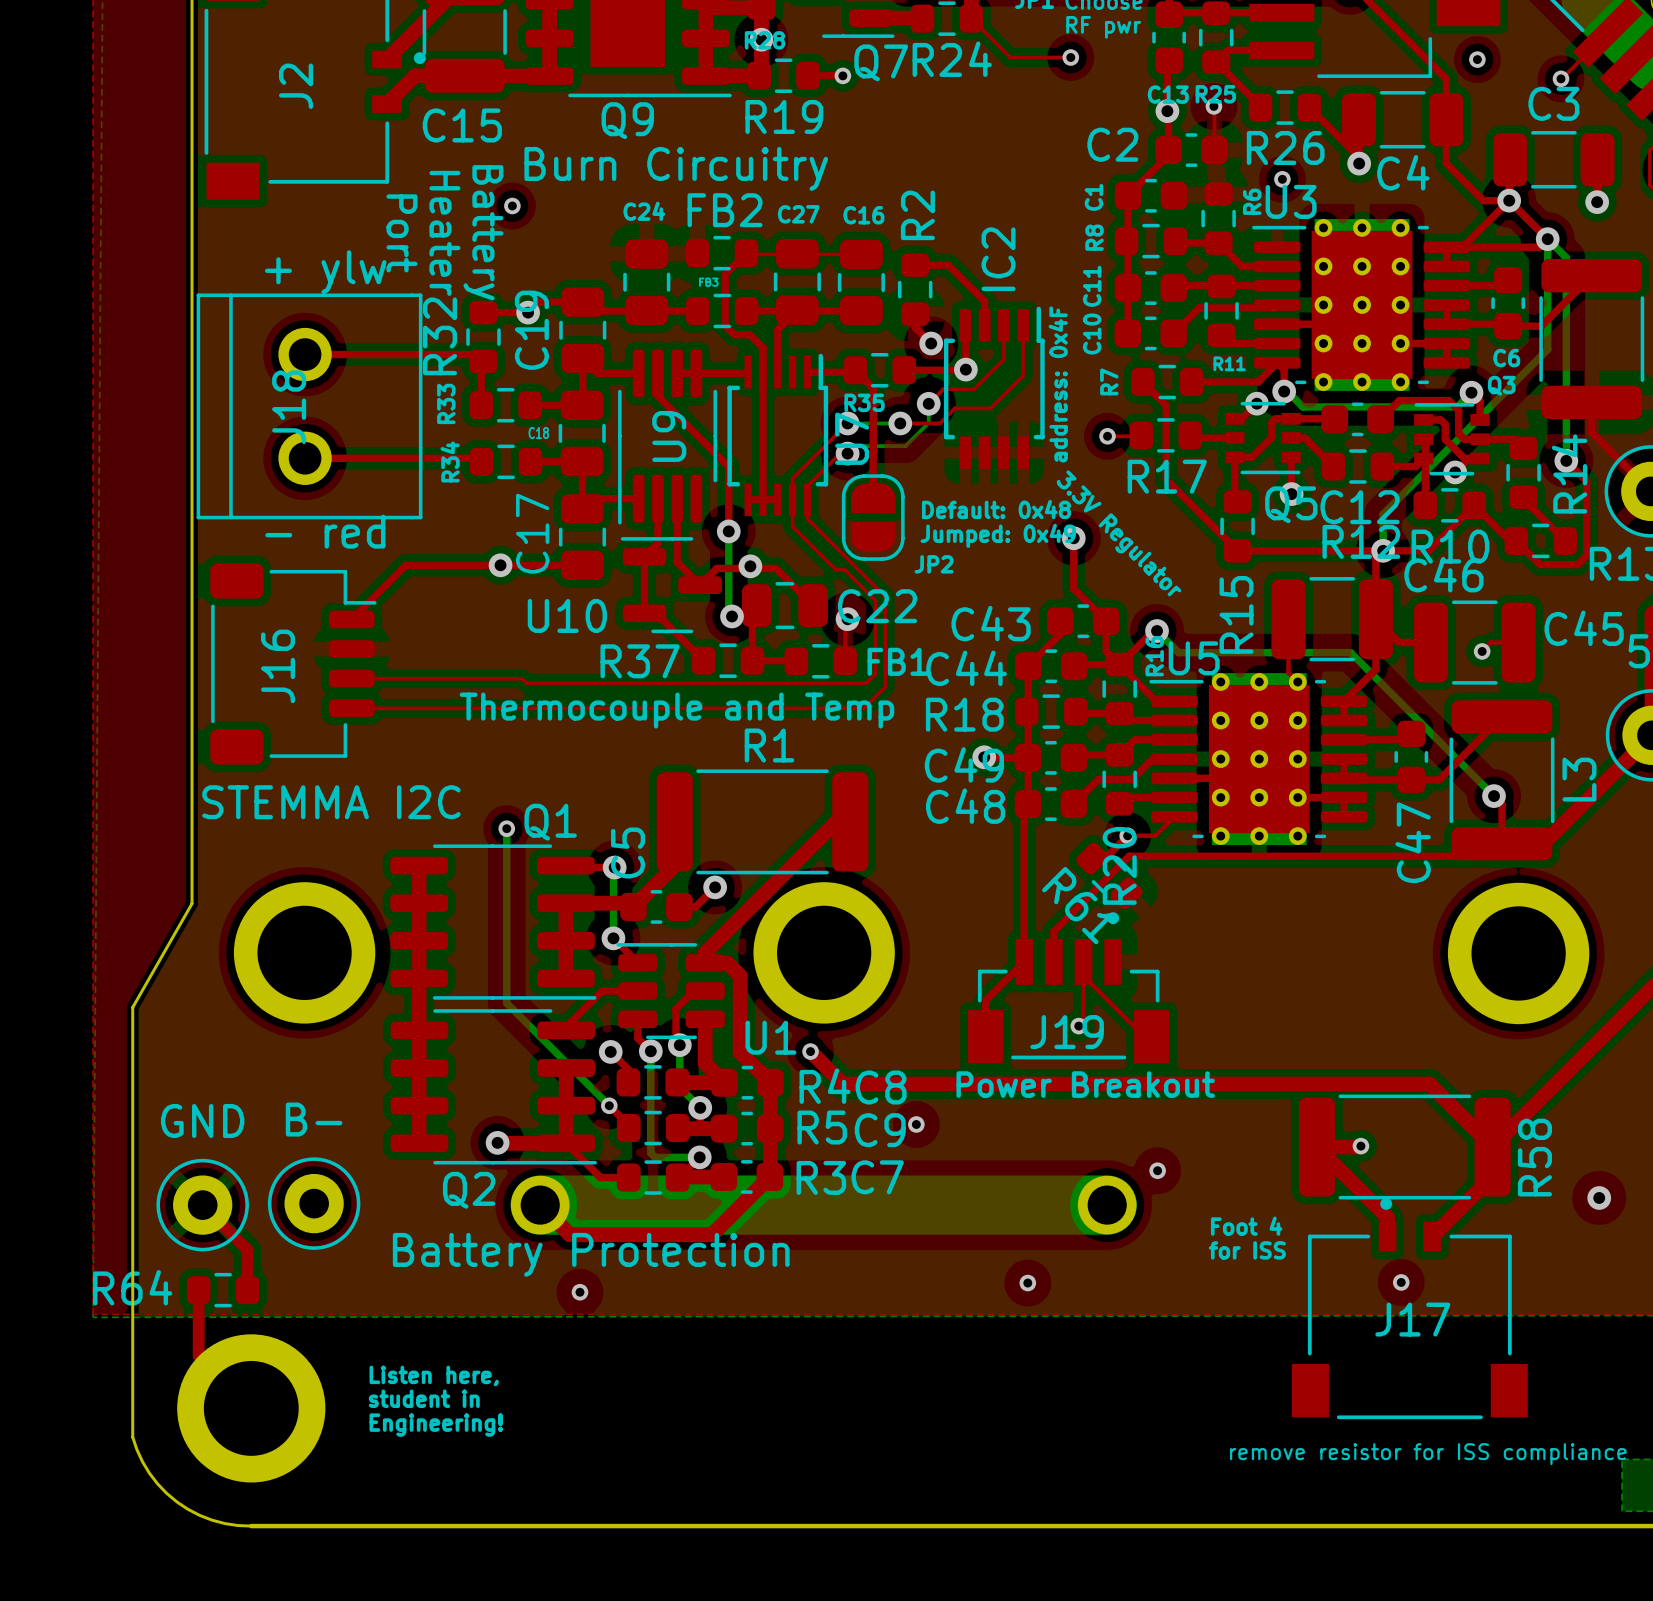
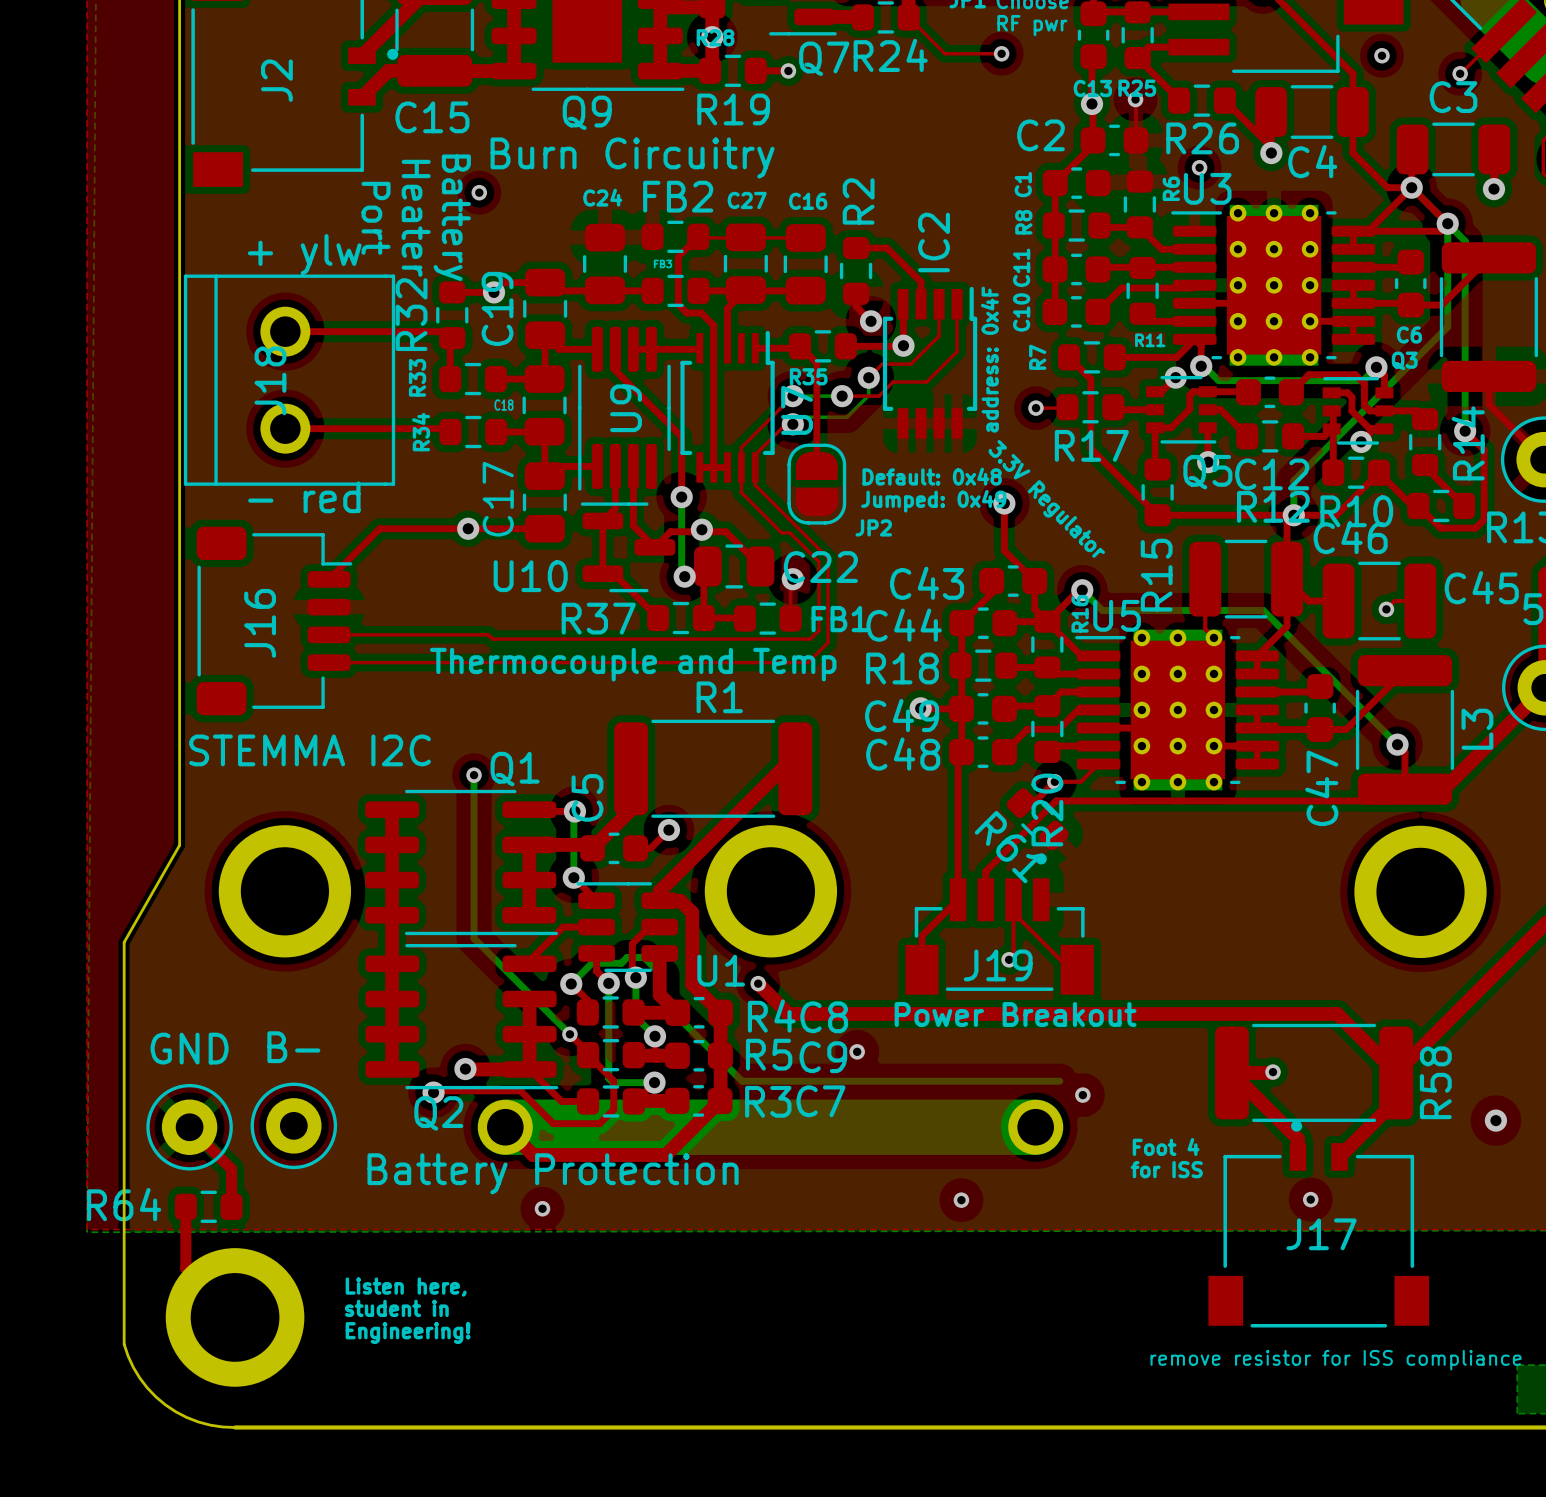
bottom track: none -> (571, 983) (592, 963) (621, 963) (627, 957) (644, 957) (662, 975) (662, 1001) (742, 1081) (1059, 1081)
top track: none -> (588, 1055) (613, 1080) (613, 1109) (599, 1123) (553, 1123) (520, 1090) (435, 1090) (433, 1092)
via: none -> (433, 1092)

